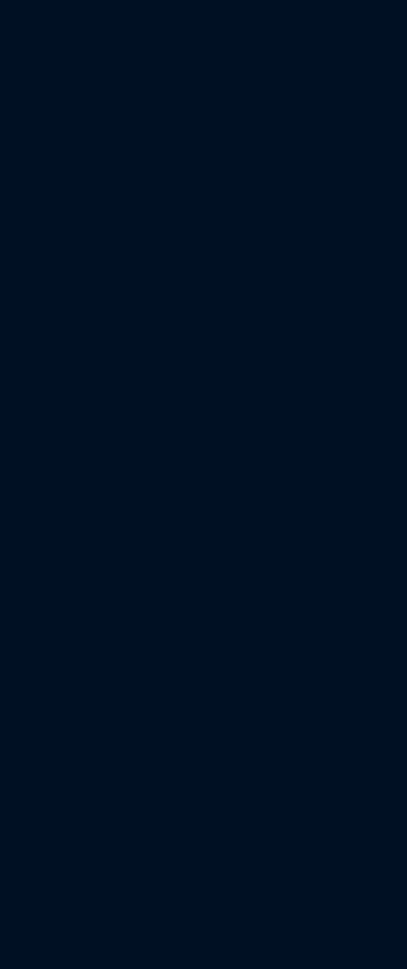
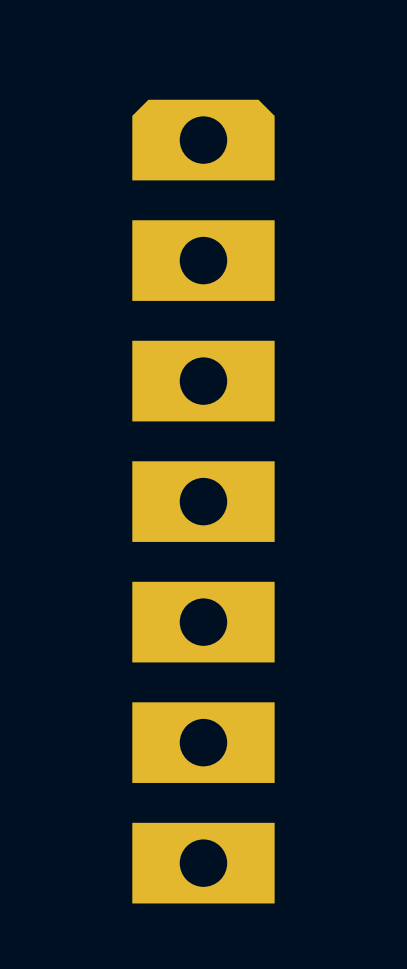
part: none -> (203, 501)

